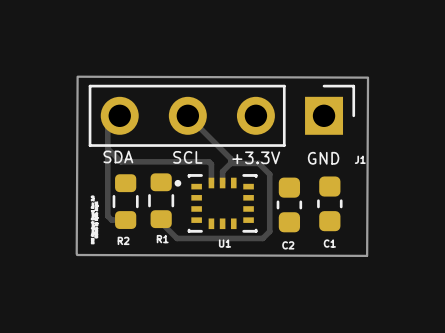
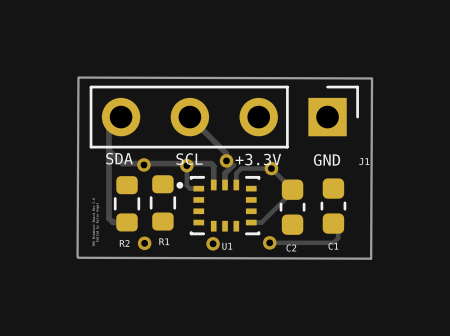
track: (224, 152) (230, 158) (230, 163) (258, 163) (269, 174) (269, 231) (262, 238) (177, 238) (155, 216) -> none
via: none -> (226, 160)
track: none -> (186, 162) (186, 185) (190, 188) (198, 188)
via: none -> (143, 164)
via: none -> (186, 165)
via: none -> (271, 168)
track: none -> (236, 185) (236, 173) (241, 168) (271, 168) (292, 189) (261, 222) (251, 222)
track: none -> (338, 223) (338, 238) (333, 242) (269, 242)
via: none -> (144, 243)
via: none -> (269, 242)
via: none -> (213, 243)

